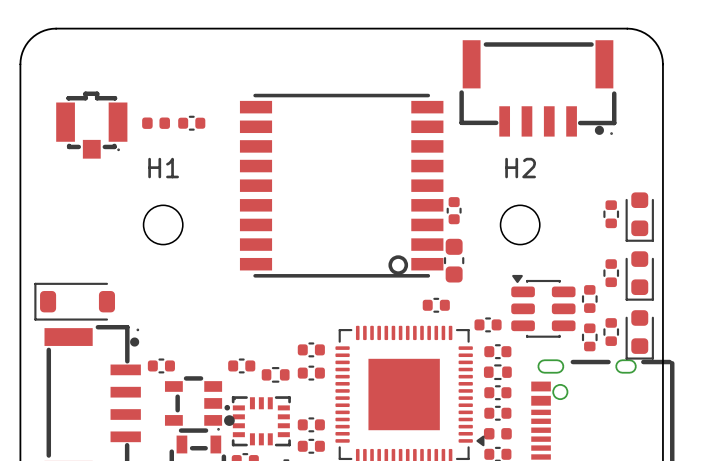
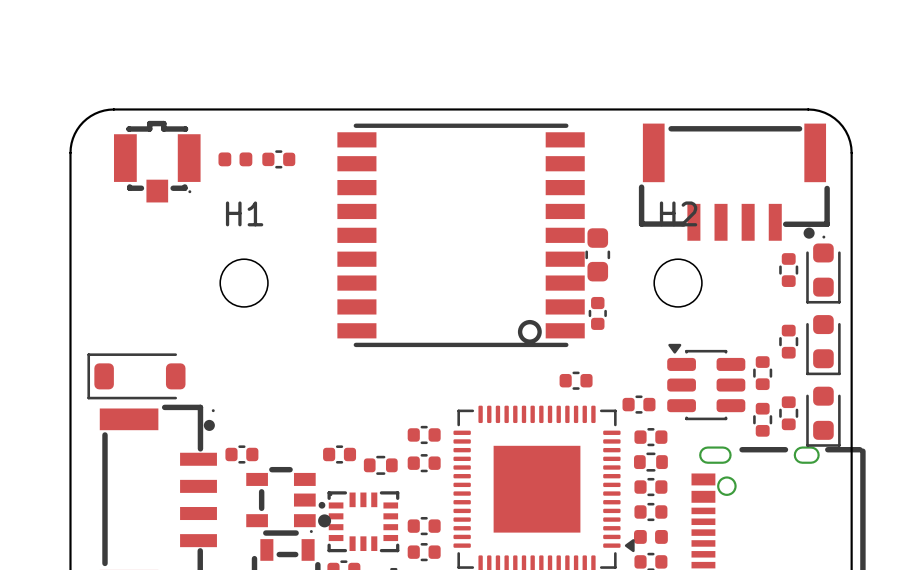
part position: (537, 88) -> (734, 182)
board edge: (20, 117) (20, 64) (22, 52) (33, 36) (44, 30) (56, 28) (631, 28) (649, 35) (660, 50) (662, 64) (662, 117) -> (70, 152) (74, 134) (83, 122) (99, 111) (113, 109) (808, 109) (824, 112) (838, 122) (848, 136) (851, 152)
part footprint: [446, 197, 462, 225] -> [585, 228, 611, 282]
part footprint: [443, 238, 465, 283] -> [588, 296, 607, 330]

